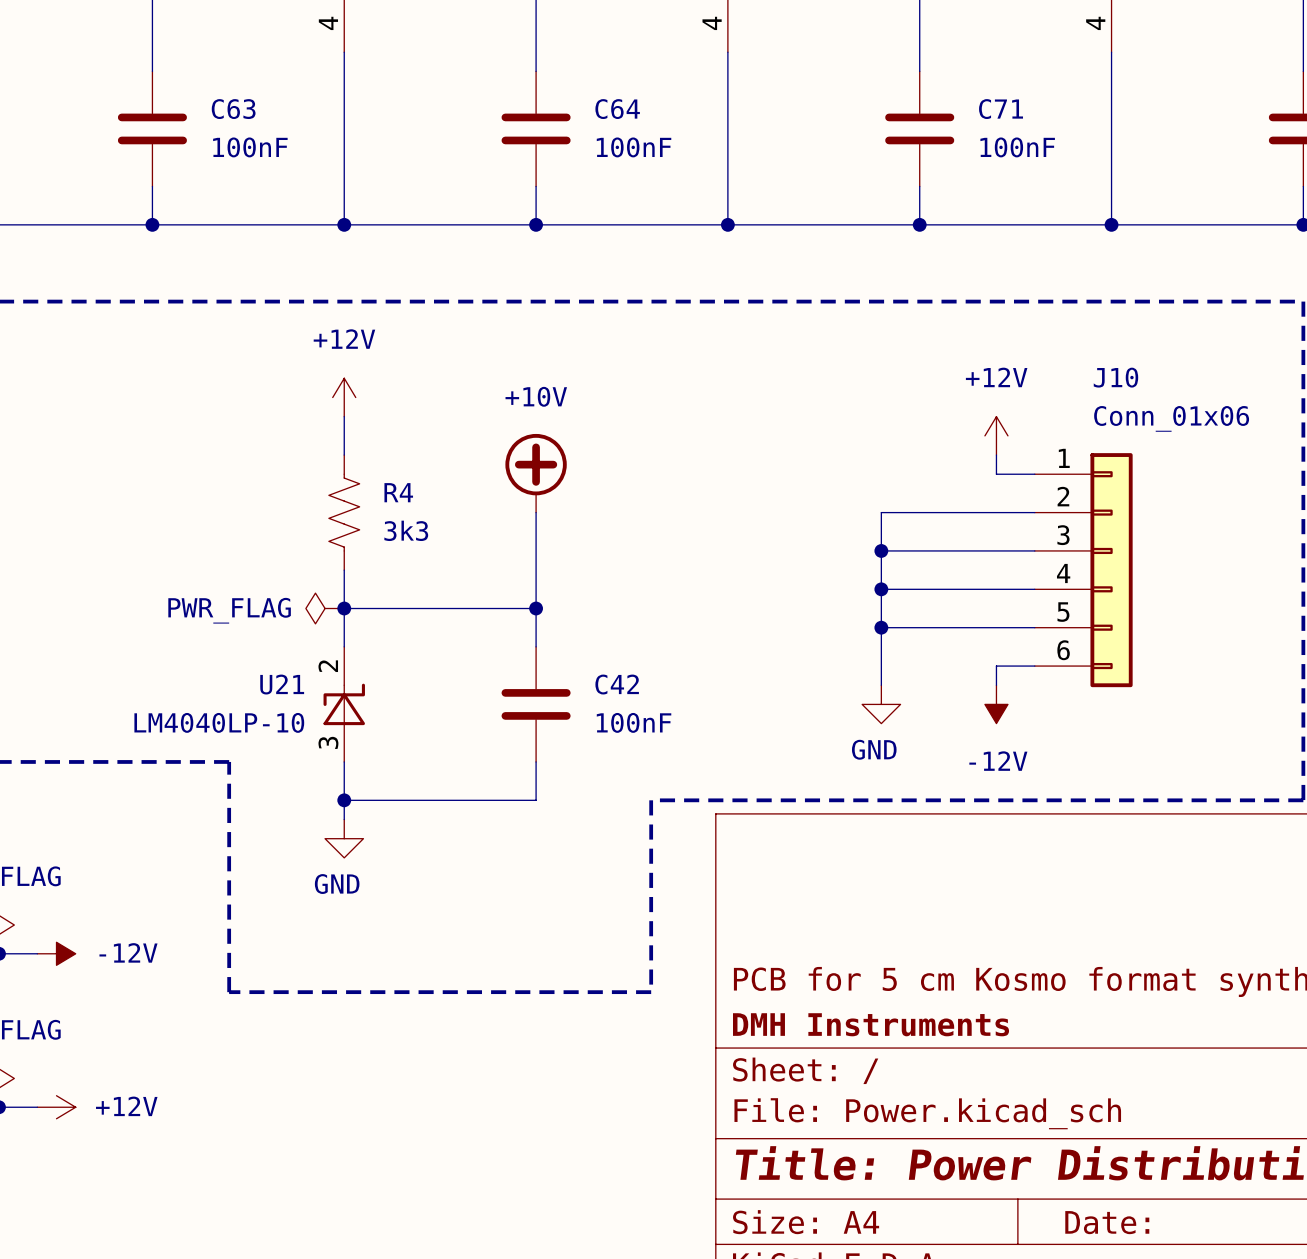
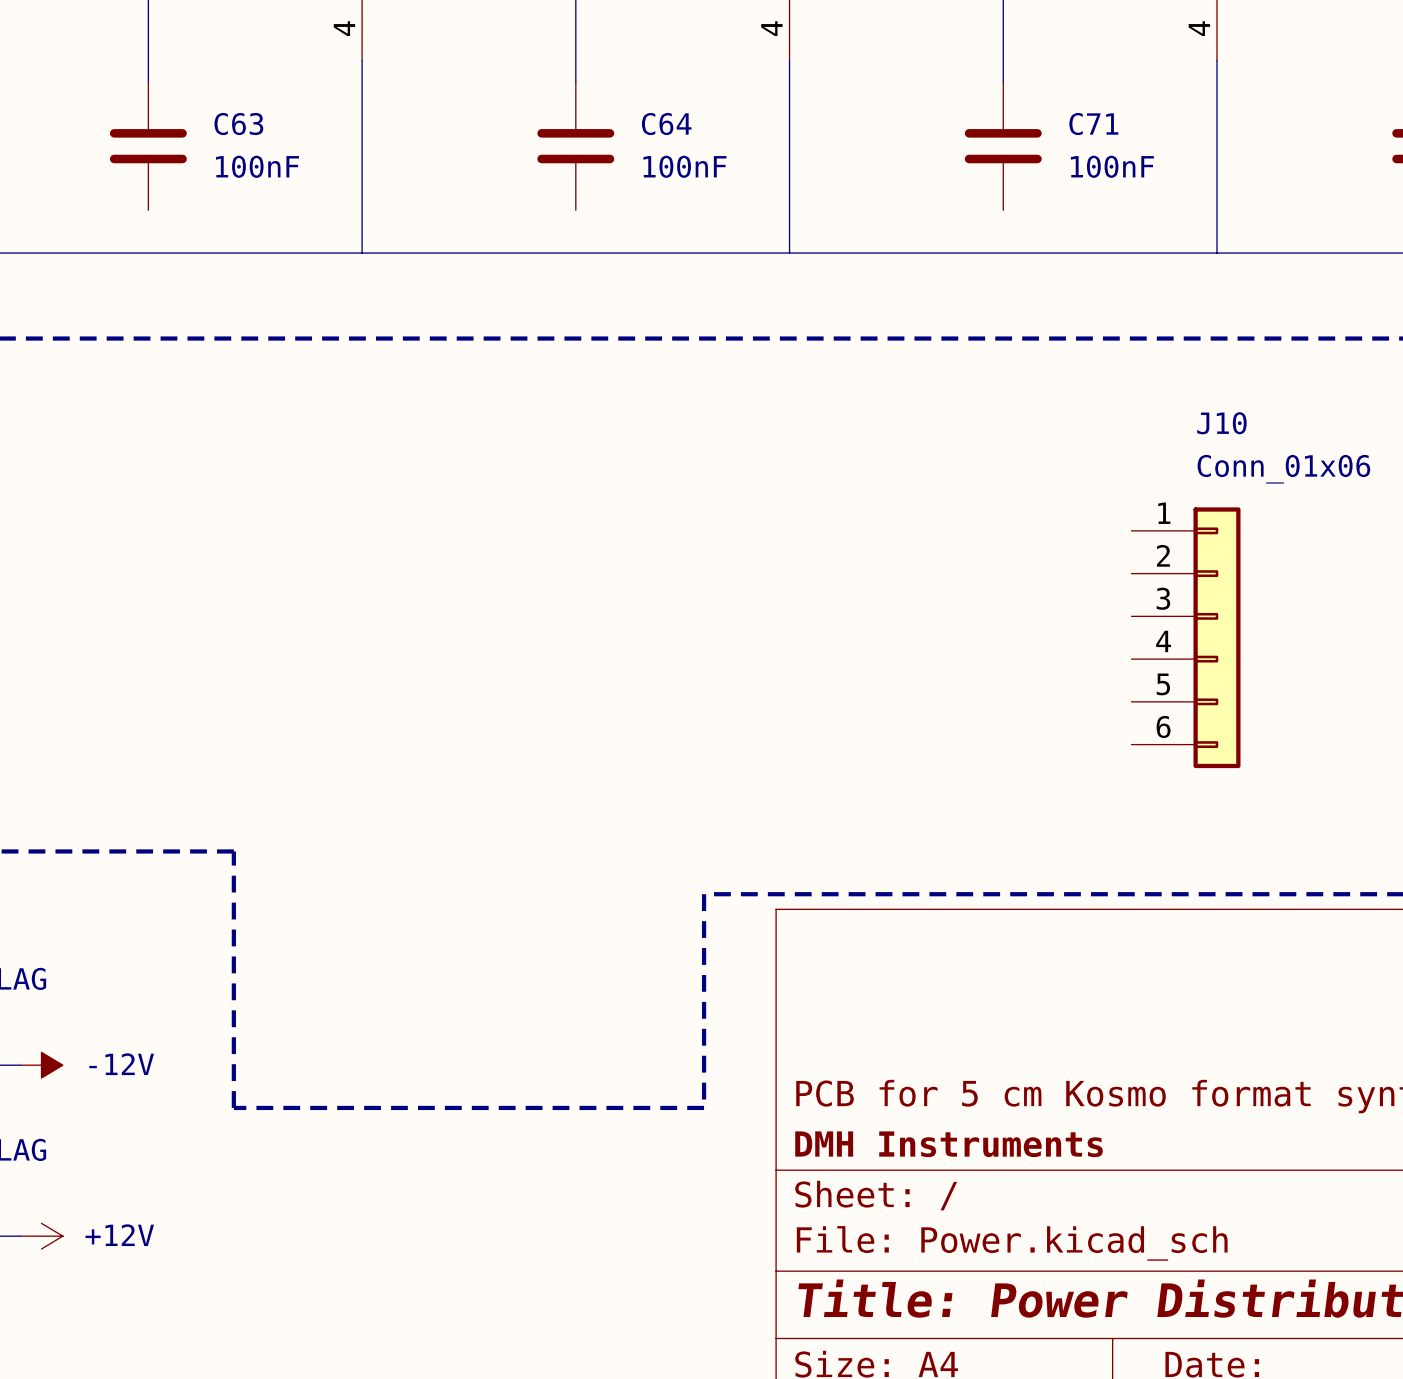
wire: (152, 186) (152, 224) -> none
wire: (536, 186) (536, 224) -> none
wire: (919, 186) (919, 224) -> none
junction: (152, 224) -> none
junction: (344, 224) -> none
junction: (536, 224) -> none
junction: (727, 224) -> none
junction: (919, 224) -> none
junction: (1111, 224) -> none
power symbol: +12V (344, 397) -> none
wire: (344, 416) (344, 455) -> none
power symbol: +12V (996, 435) -> none
wire: (996, 455) (996, 474) (1034, 474) -> none
power symbol: +10V (536, 473) -> none
R4: 3k3 (344, 512) -> none
wire: (536, 512) (536, 646) -> none
wire: (1034, 512) (881, 512) (881, 685) -> none
wire: (881, 550) (1034, 550) -> none
junction: (881, 550) -> none
wire: (344, 570) (344, 646) -> none
wire: (881, 589) (1034, 589) -> none
junction: (881, 589) -> none
power symbol: PWR_FLAG (325, 608) -> none
wire: (344, 608) (536, 608) -> none
junction: (344, 608) -> none
junction: (536, 608) -> none
wire: (881, 627) (1034, 627) -> none
junction: (881, 627) -> none
wire: (1034, 666) (996, 666) (996, 685) -> none
U21: LM4040LP-10 (344, 704) -> none
C42: 100nF (536, 704) -> none
power symbol: GND (881, 704) -> none
power symbol: -12V (996, 704) -> none
wire: (344, 761) (344, 819) -> none
wire: (536, 761) (536, 800) (344, 800) -> none
junction: (344, 800) -> none
power symbol: GND (344, 838) -> none

